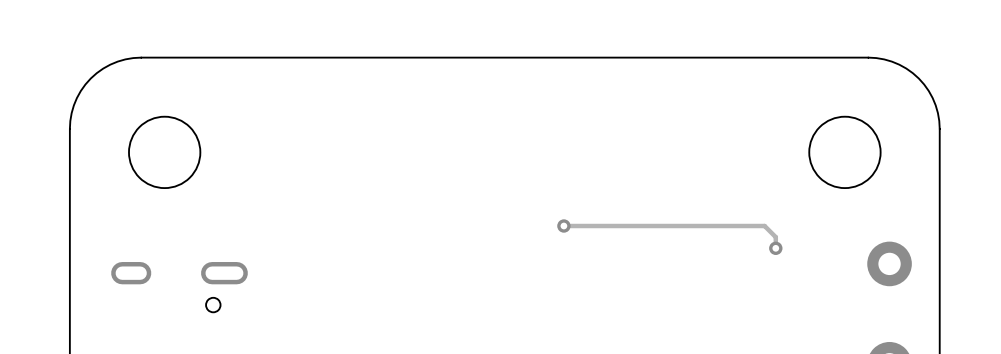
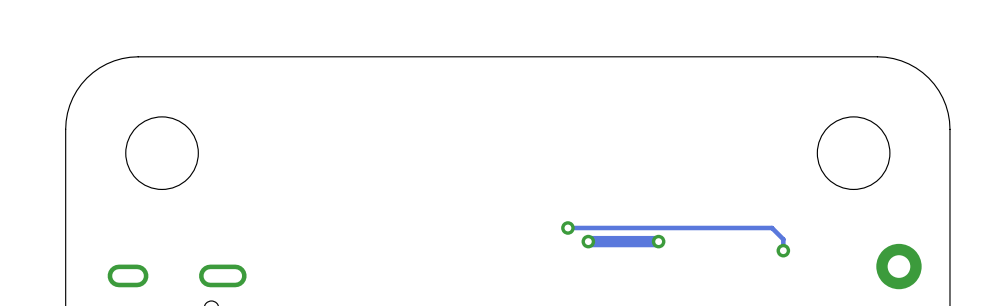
via: none -> (588, 241)
track: none -> (658, 241) (588, 241)
via: none -> (658, 241)

